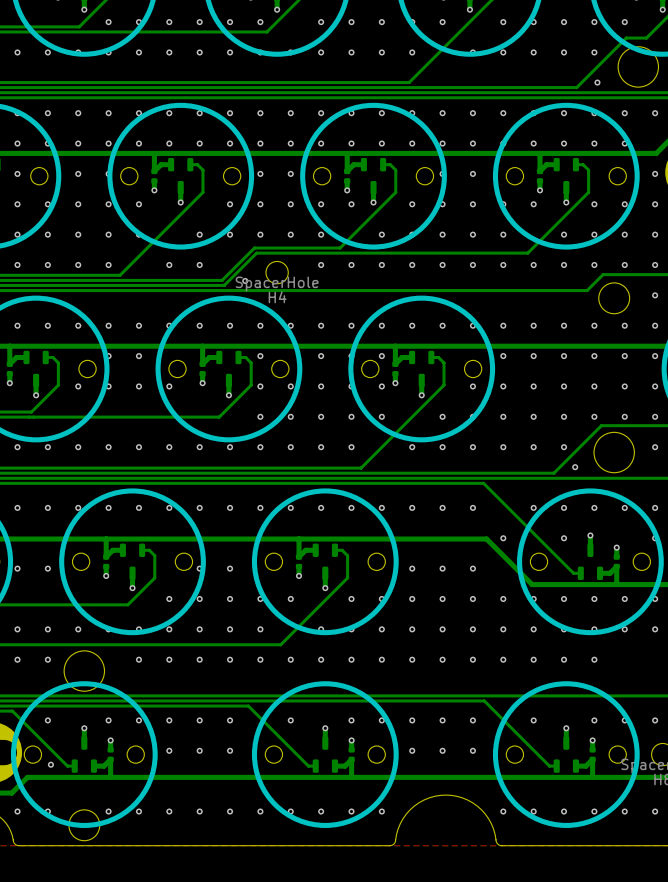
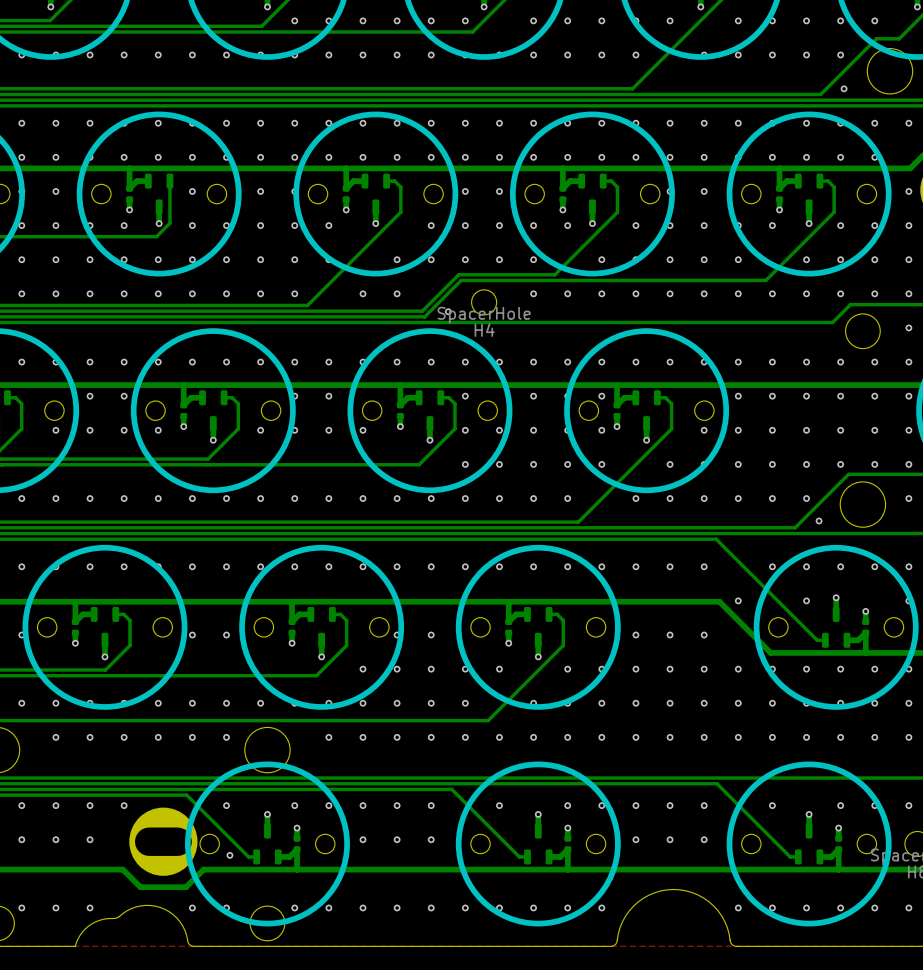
via: none -> (874, 737)
via: none -> (908, 737)

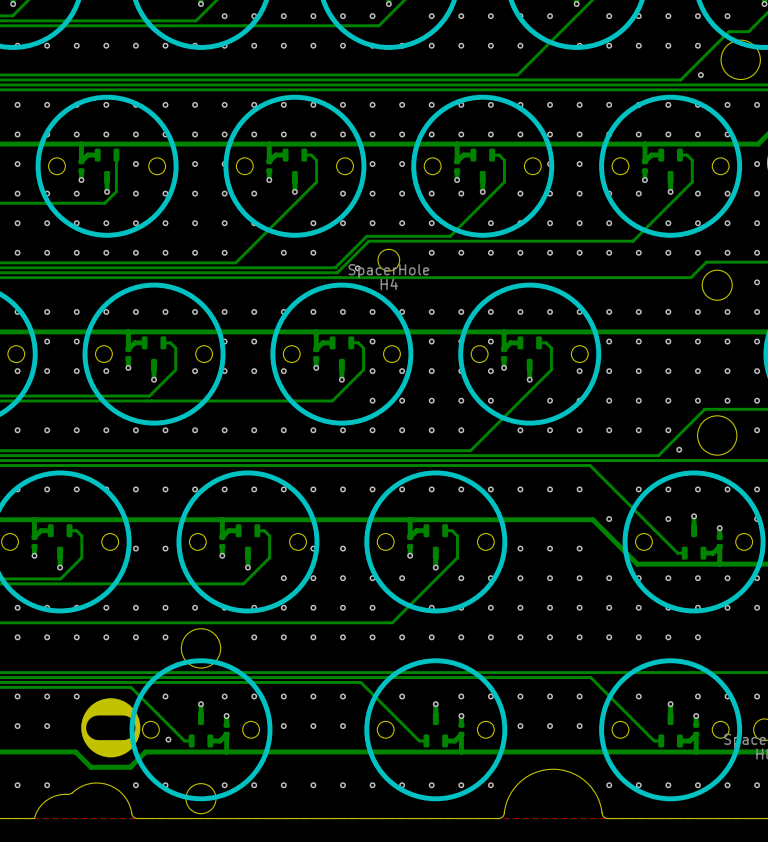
via: (874, 737) -> none
via: (908, 737) -> none

